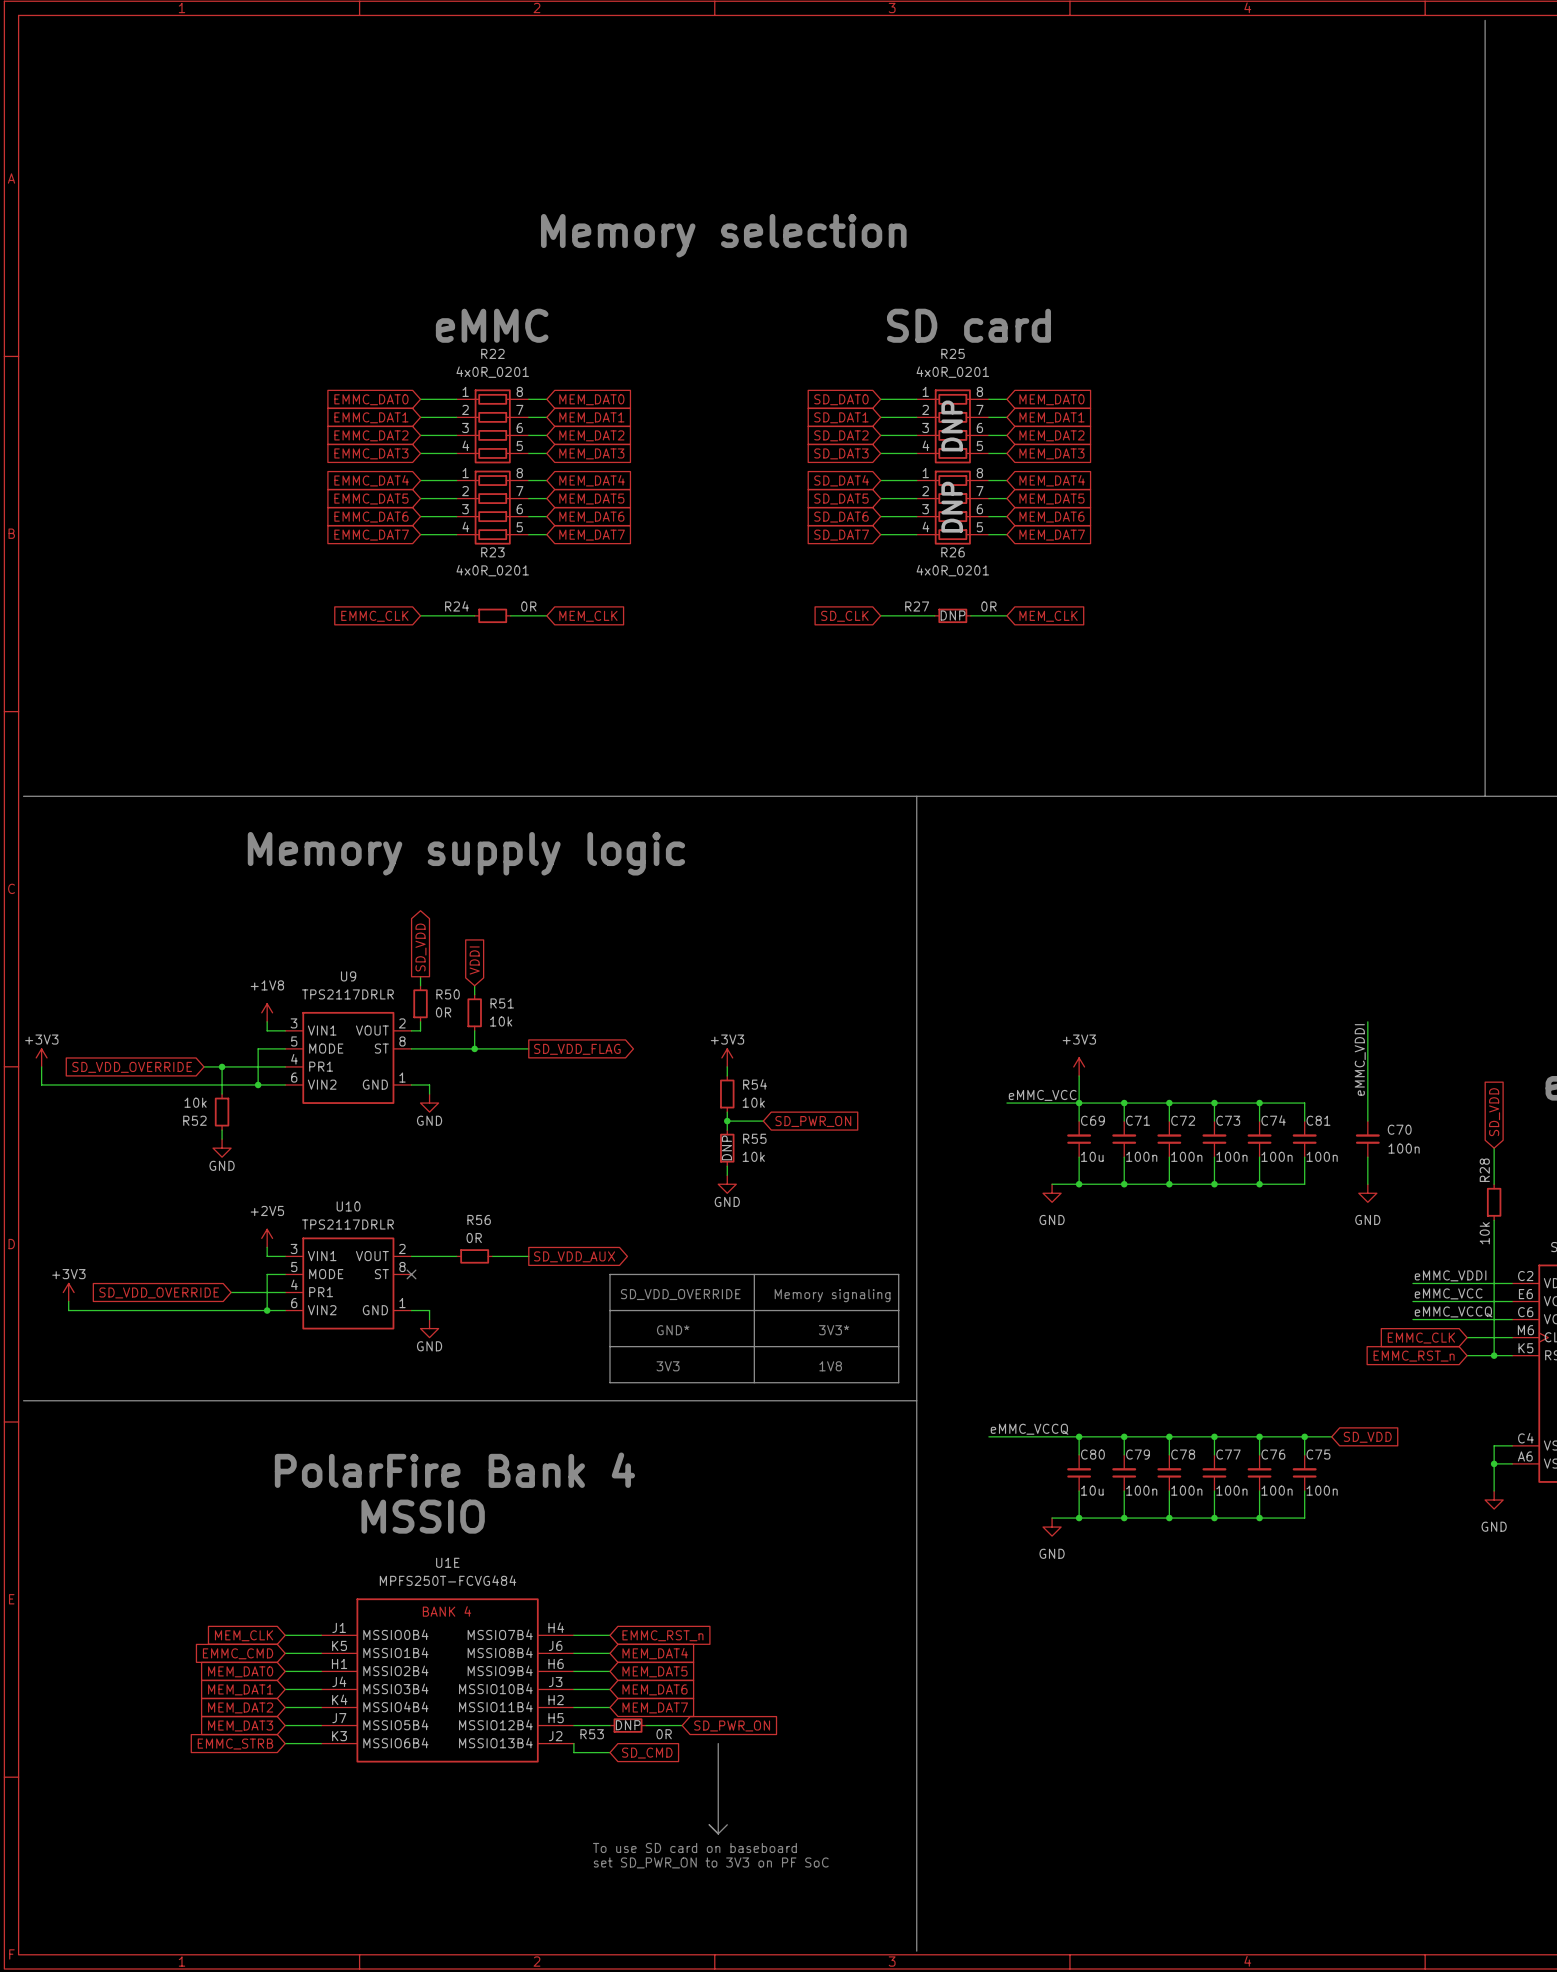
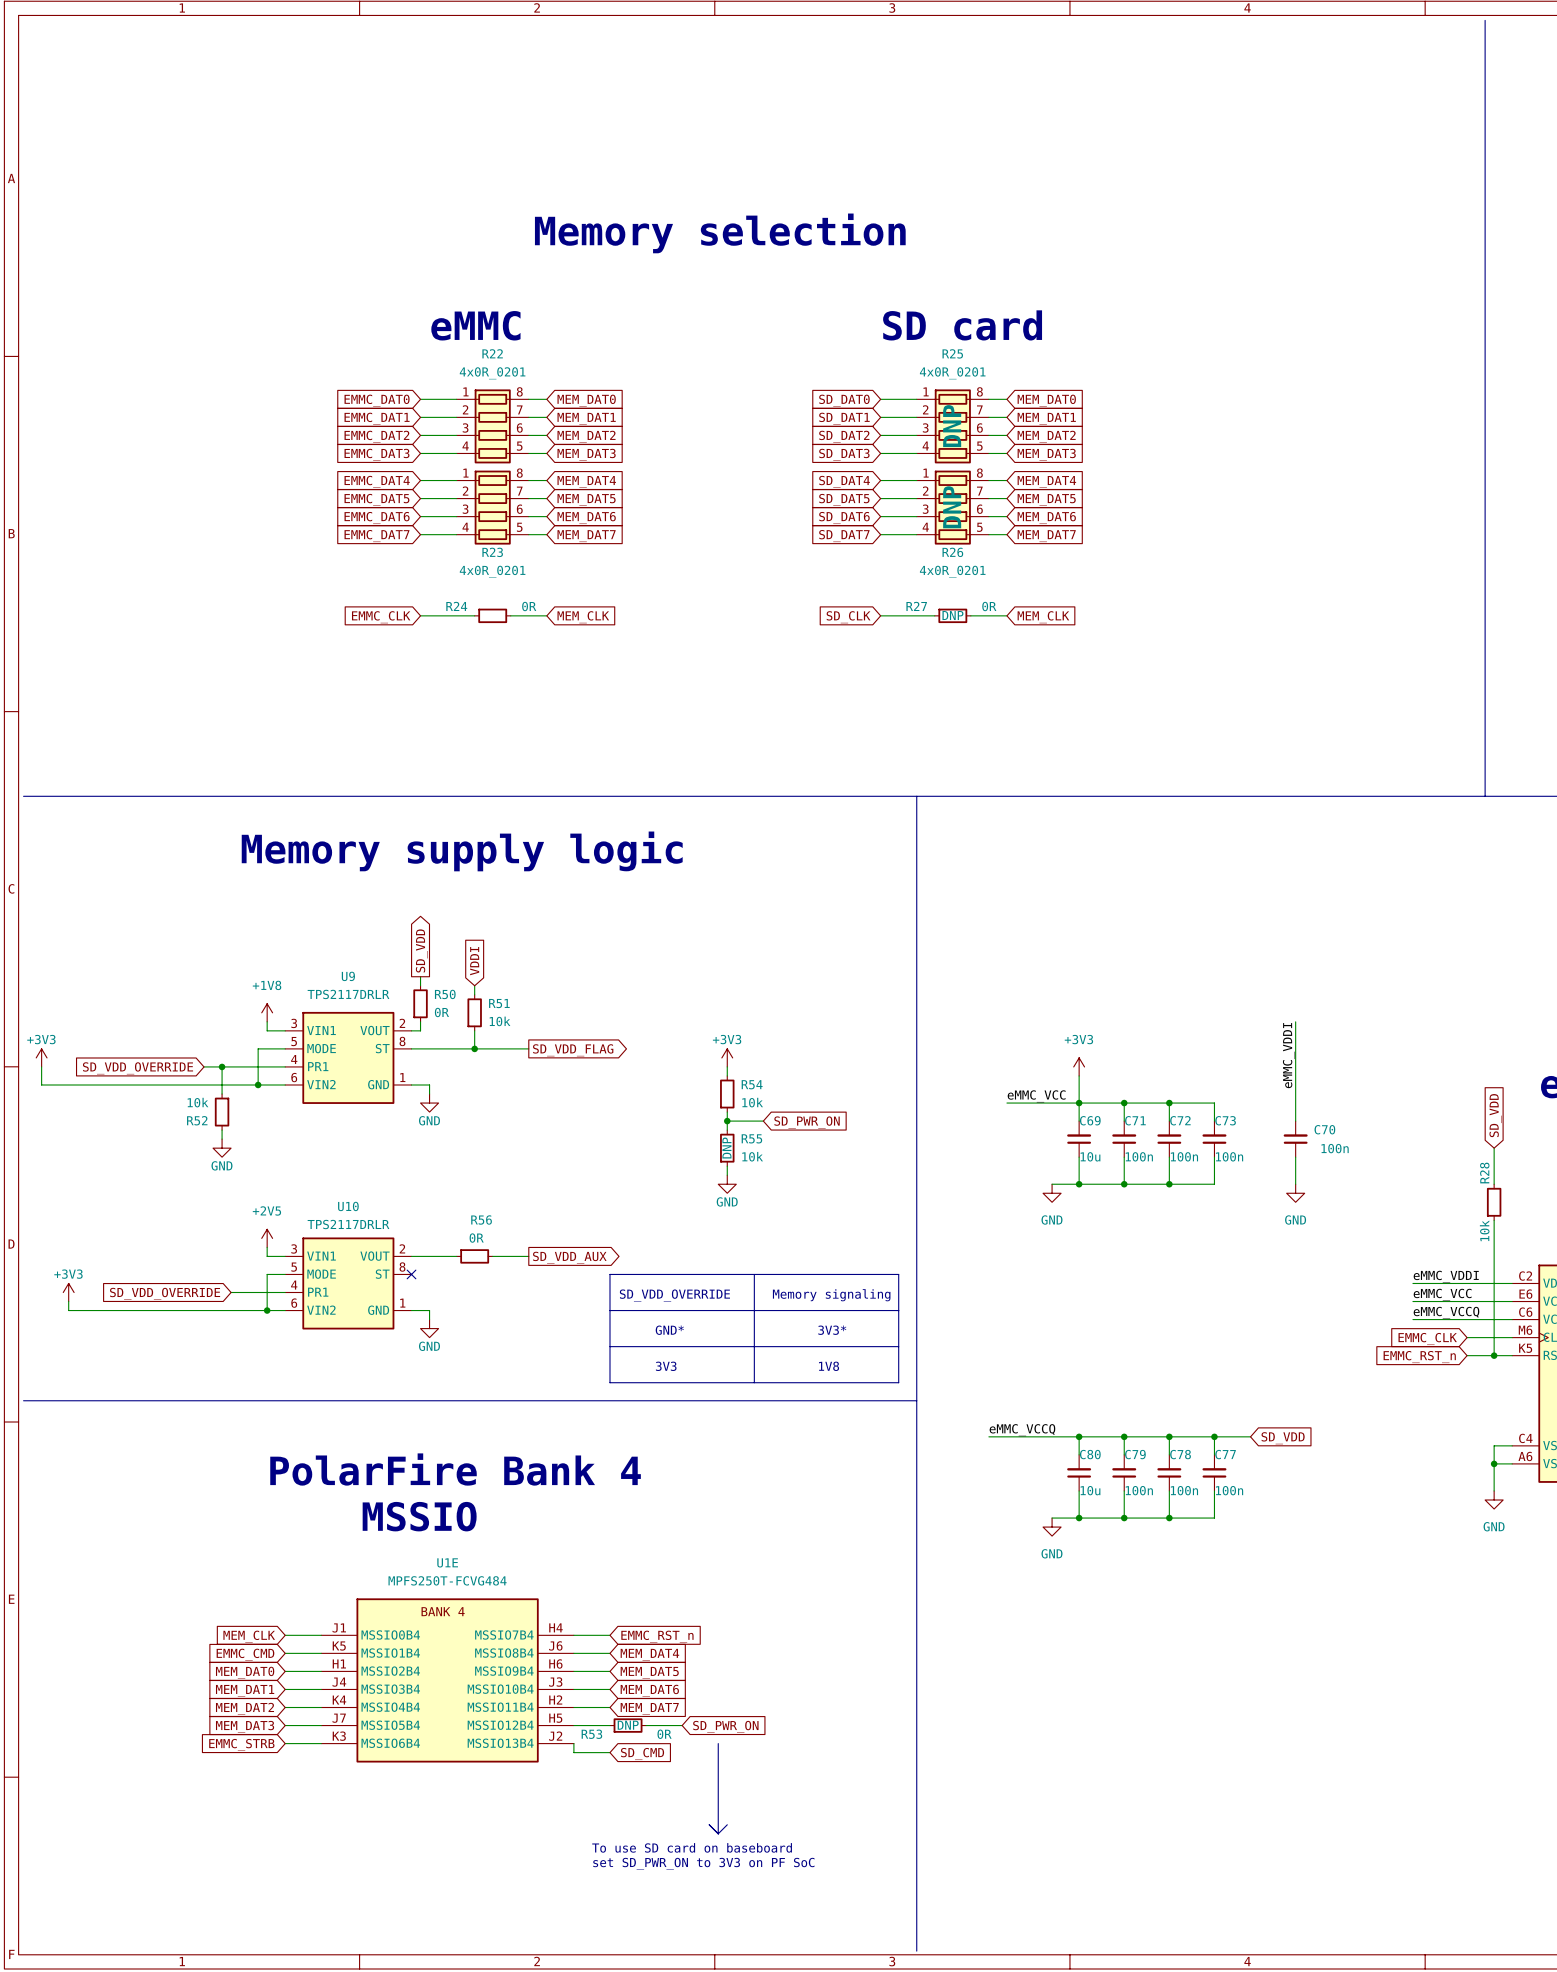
wire: (1367, 1021) (1367, 1121) -> (1295, 1021) (1295, 1121)
label position: eMMC_VDDI (1360, 1059) -> eMMC_VDDI (1288, 1055)
wire: (1214, 1103) (1304, 1103) (1304, 1121) -> none
junction: (1214, 1103) -> none
wire: (1259, 1103) (1259, 1121) -> none
junction: (1259, 1103) -> none
C74: (1259, 1139) -> none
C81: (1304, 1139) -> none
C70 position: (1367, 1139) -> (1295, 1139)
wire: (1259, 1157) (1259, 1184) -> none
wire: (1304, 1157) (1304, 1184) (1214, 1184) -> none
wire: (1367, 1157) (1367, 1184) -> (1295, 1157) (1295, 1184)
junction: (1214, 1184) -> none
junction: (1259, 1184) -> none
power symbol position: GND (1367, 1193) -> GND (1295, 1193)
wire: (1250, 1436) (1331, 1436) -> none
wire: (1259, 1436) (1259, 1454) -> none
junction: (1259, 1436) -> none
wire: (1304, 1436) (1304, 1454) -> none
junction: (1304, 1436) -> none
global label position: SD_VDD (1367, 1437) -> SD_VDD (1283, 1438)
C76: (1259, 1472) -> none
C75: (1304, 1472) -> none
wire: (1259, 1490) (1259, 1518) -> none
wire: (1304, 1490) (1304, 1518) (1214, 1518) -> none
junction: (1214, 1518) -> none
junction: (1259, 1518) -> none

